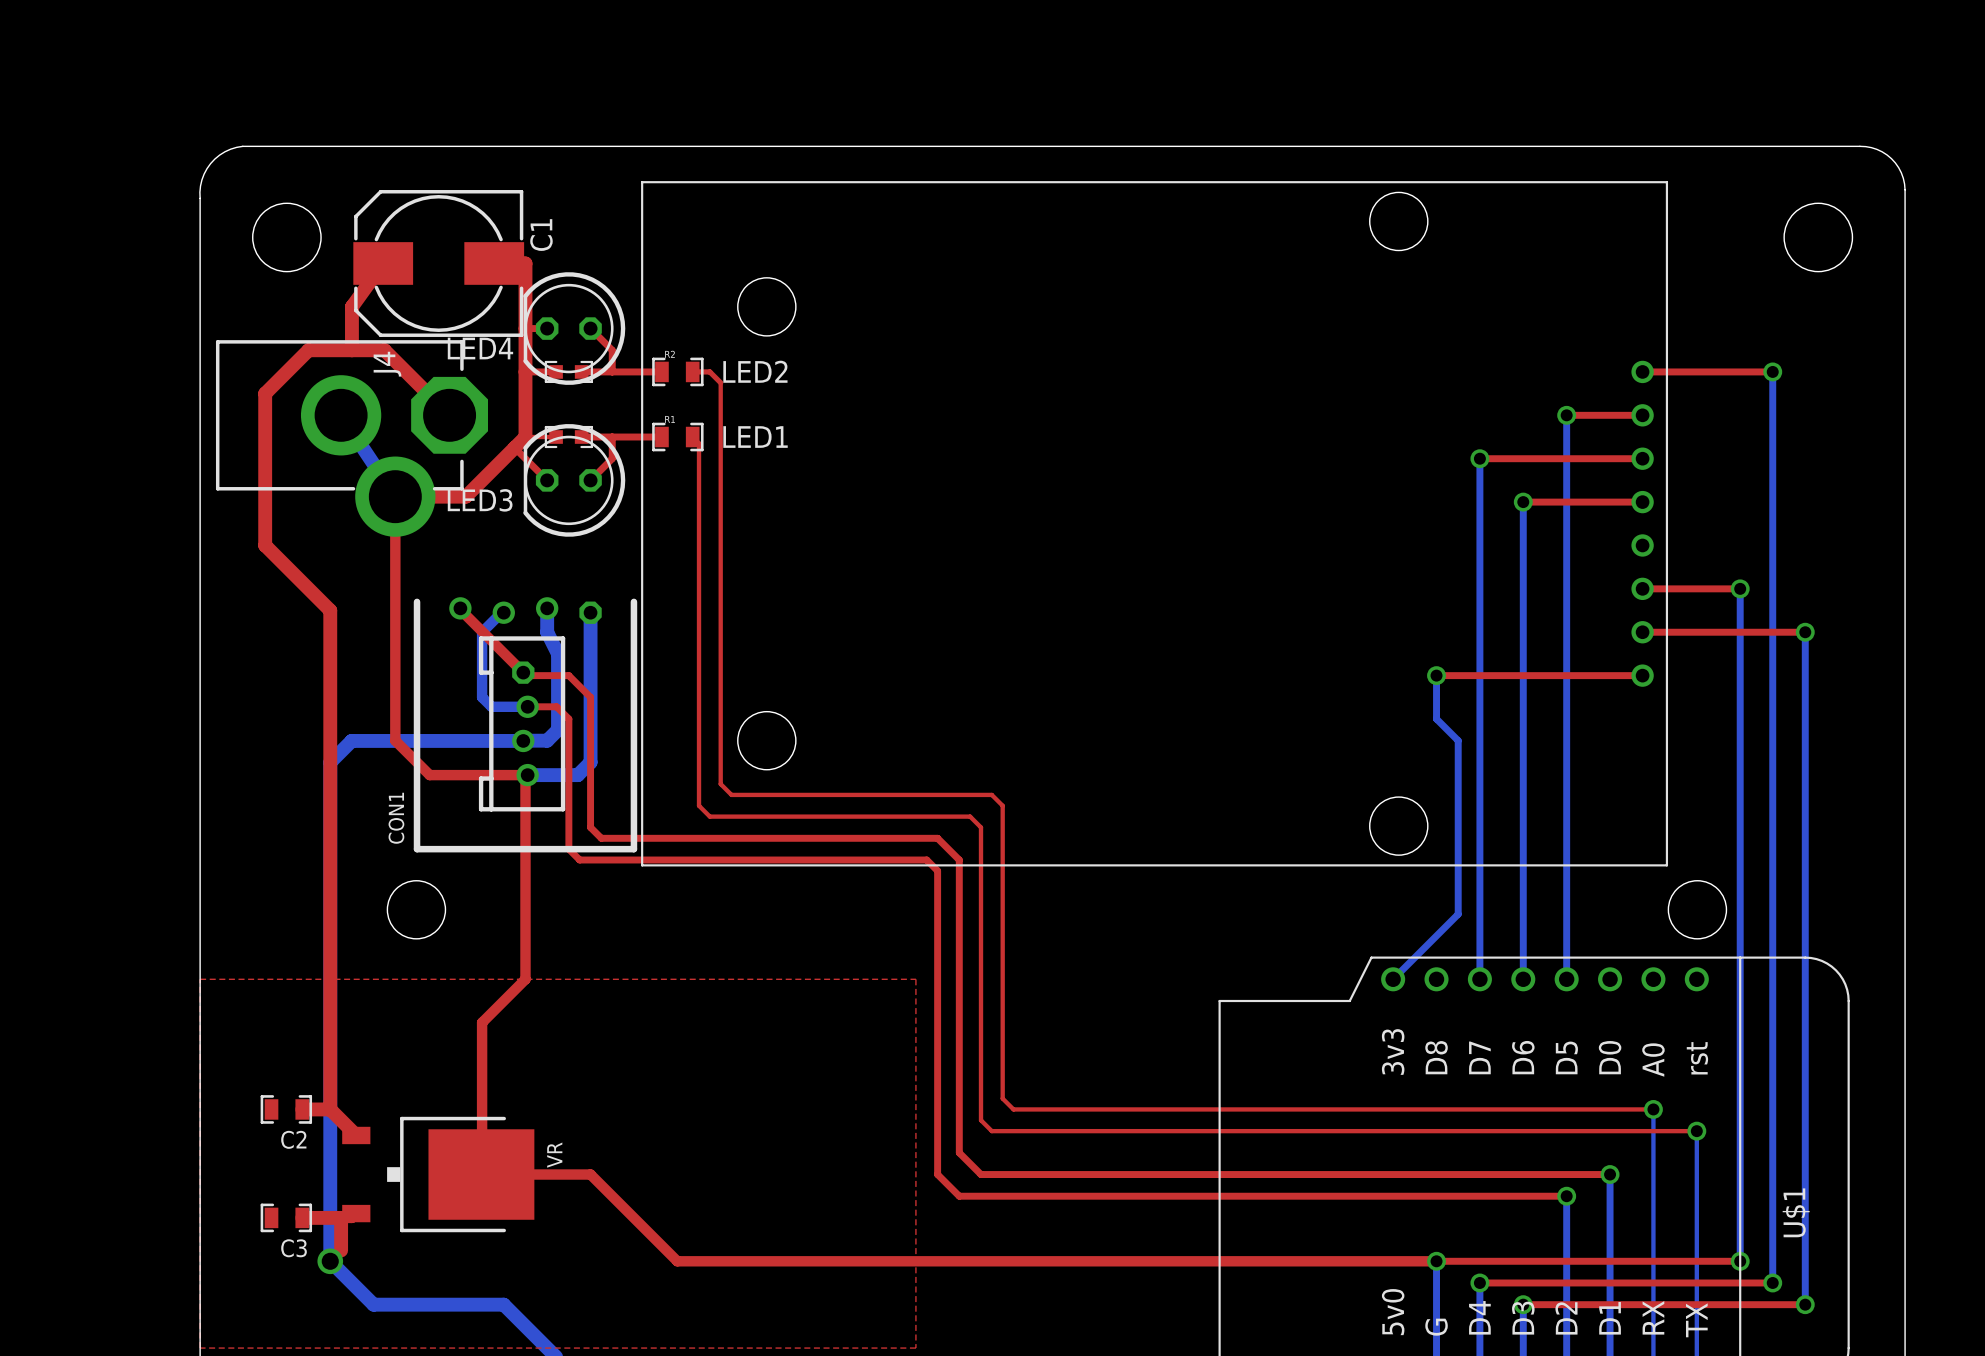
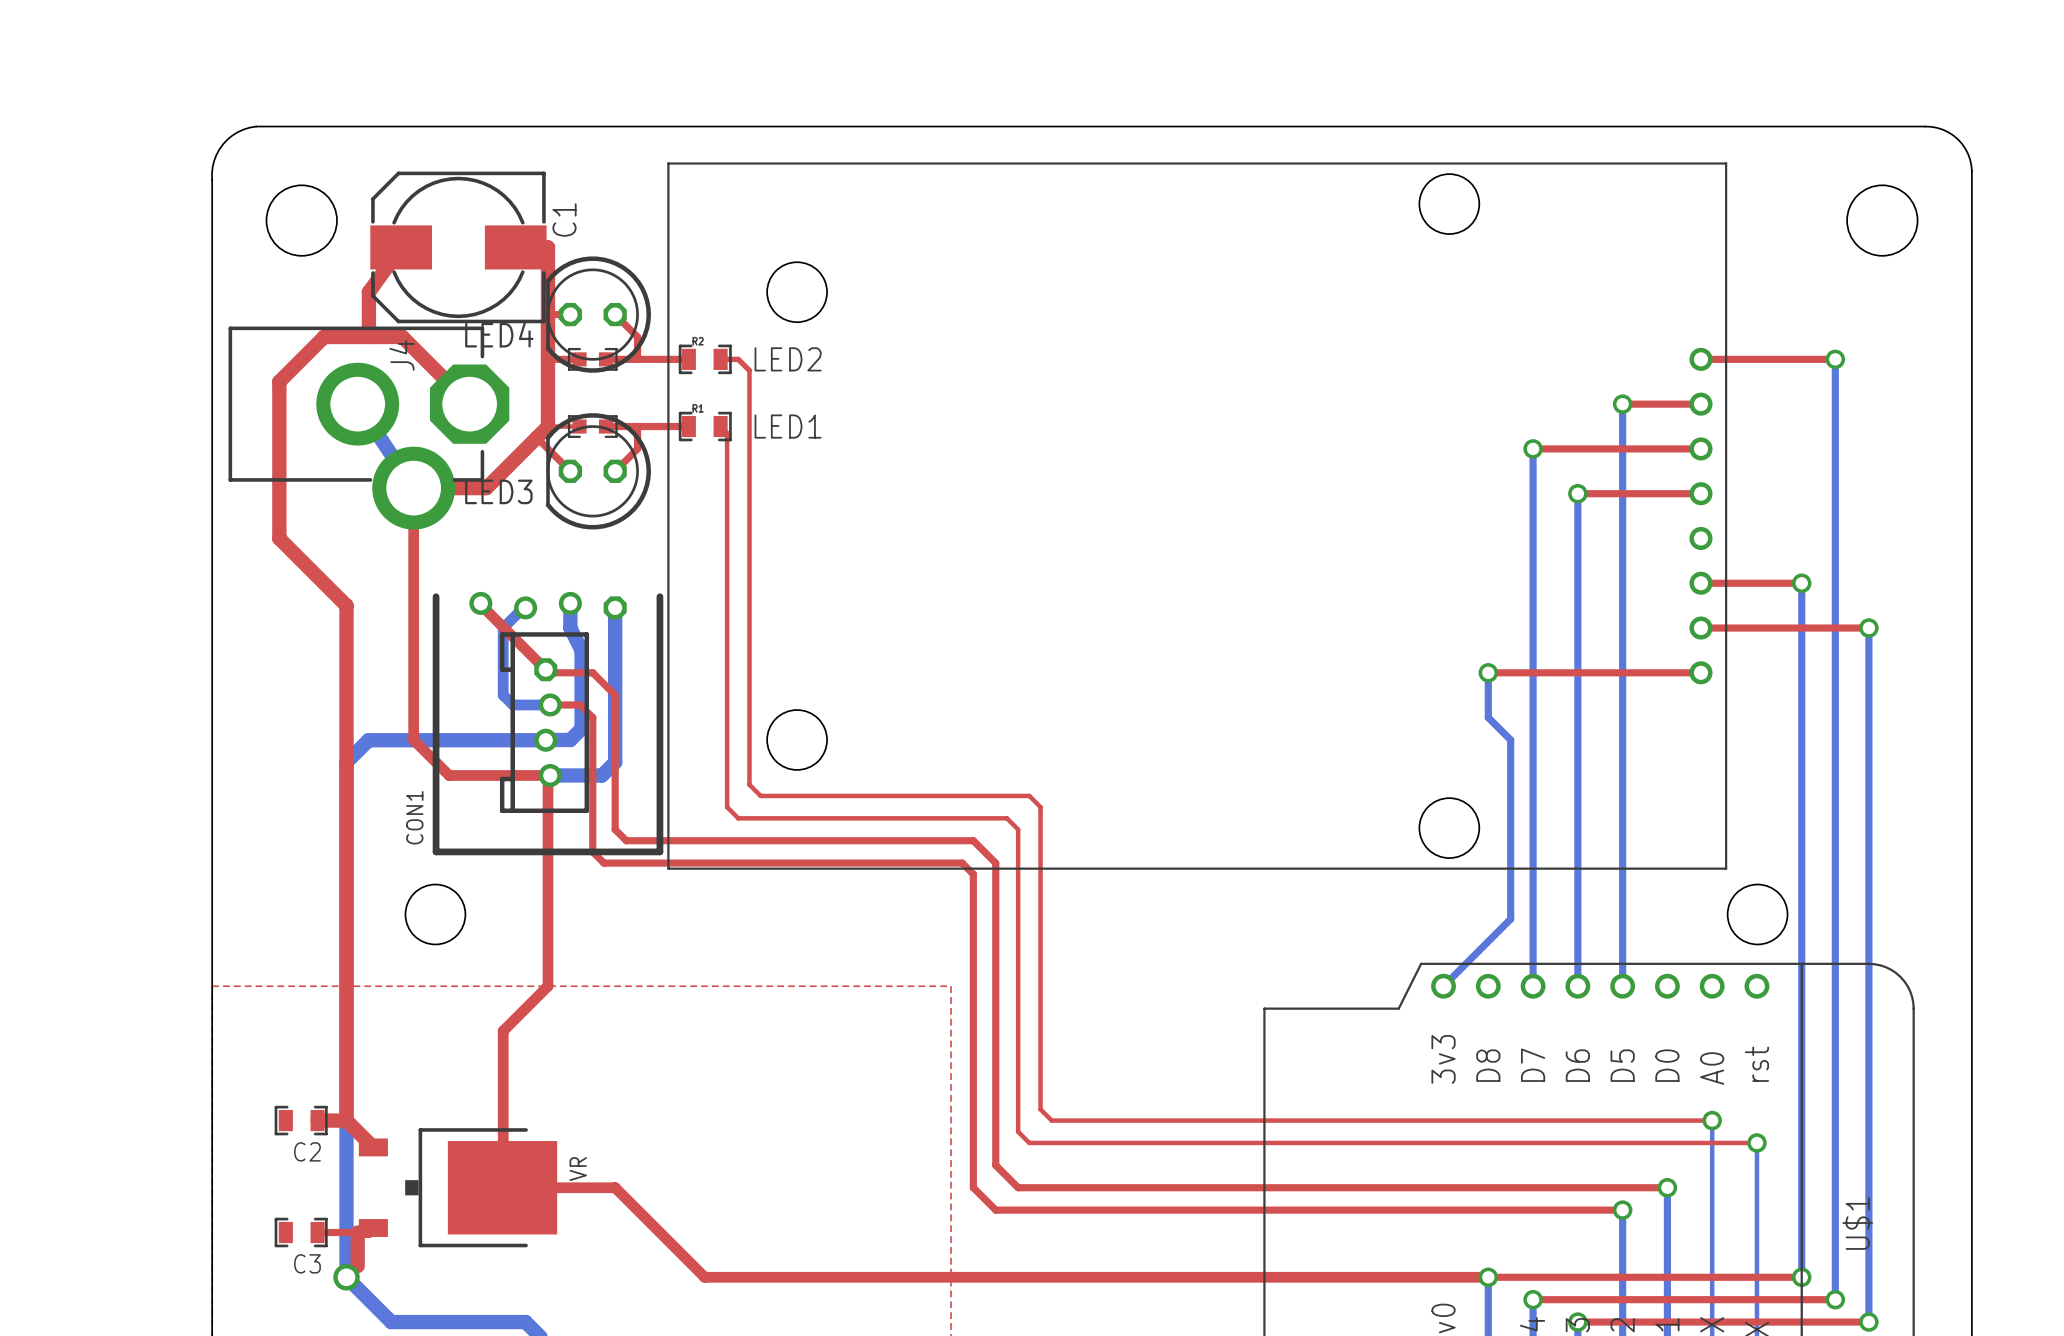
top track width: thick (302, 1217) (341, 1217) -> thin (317, 1232) (357, 1232)

